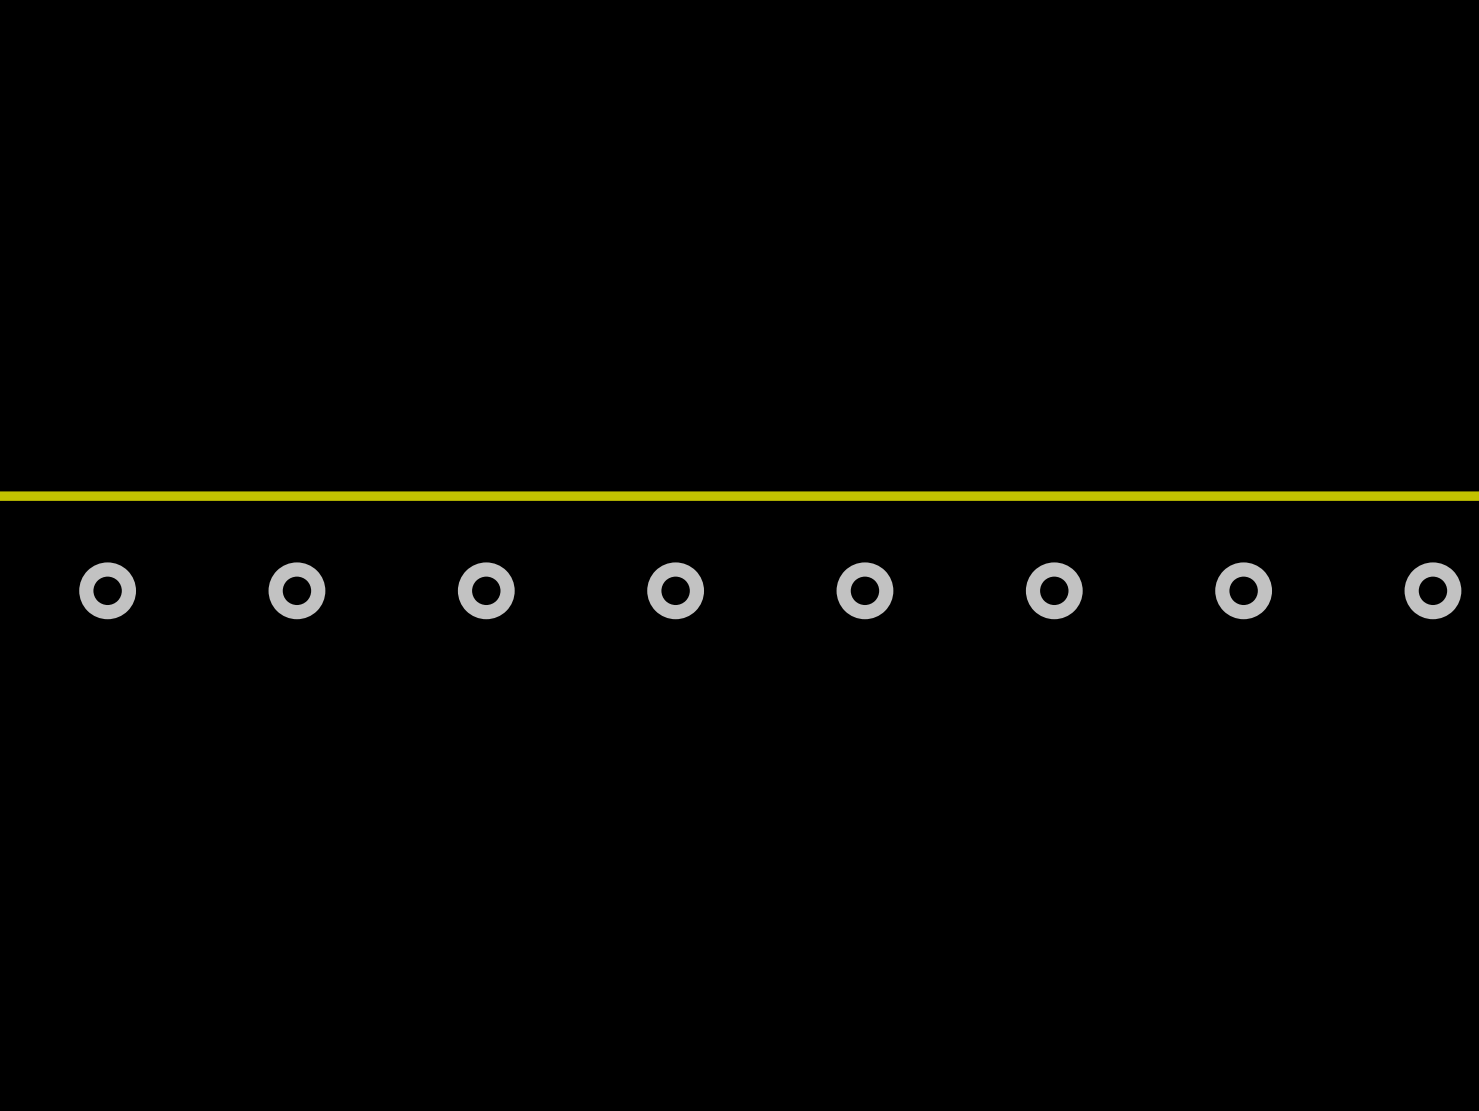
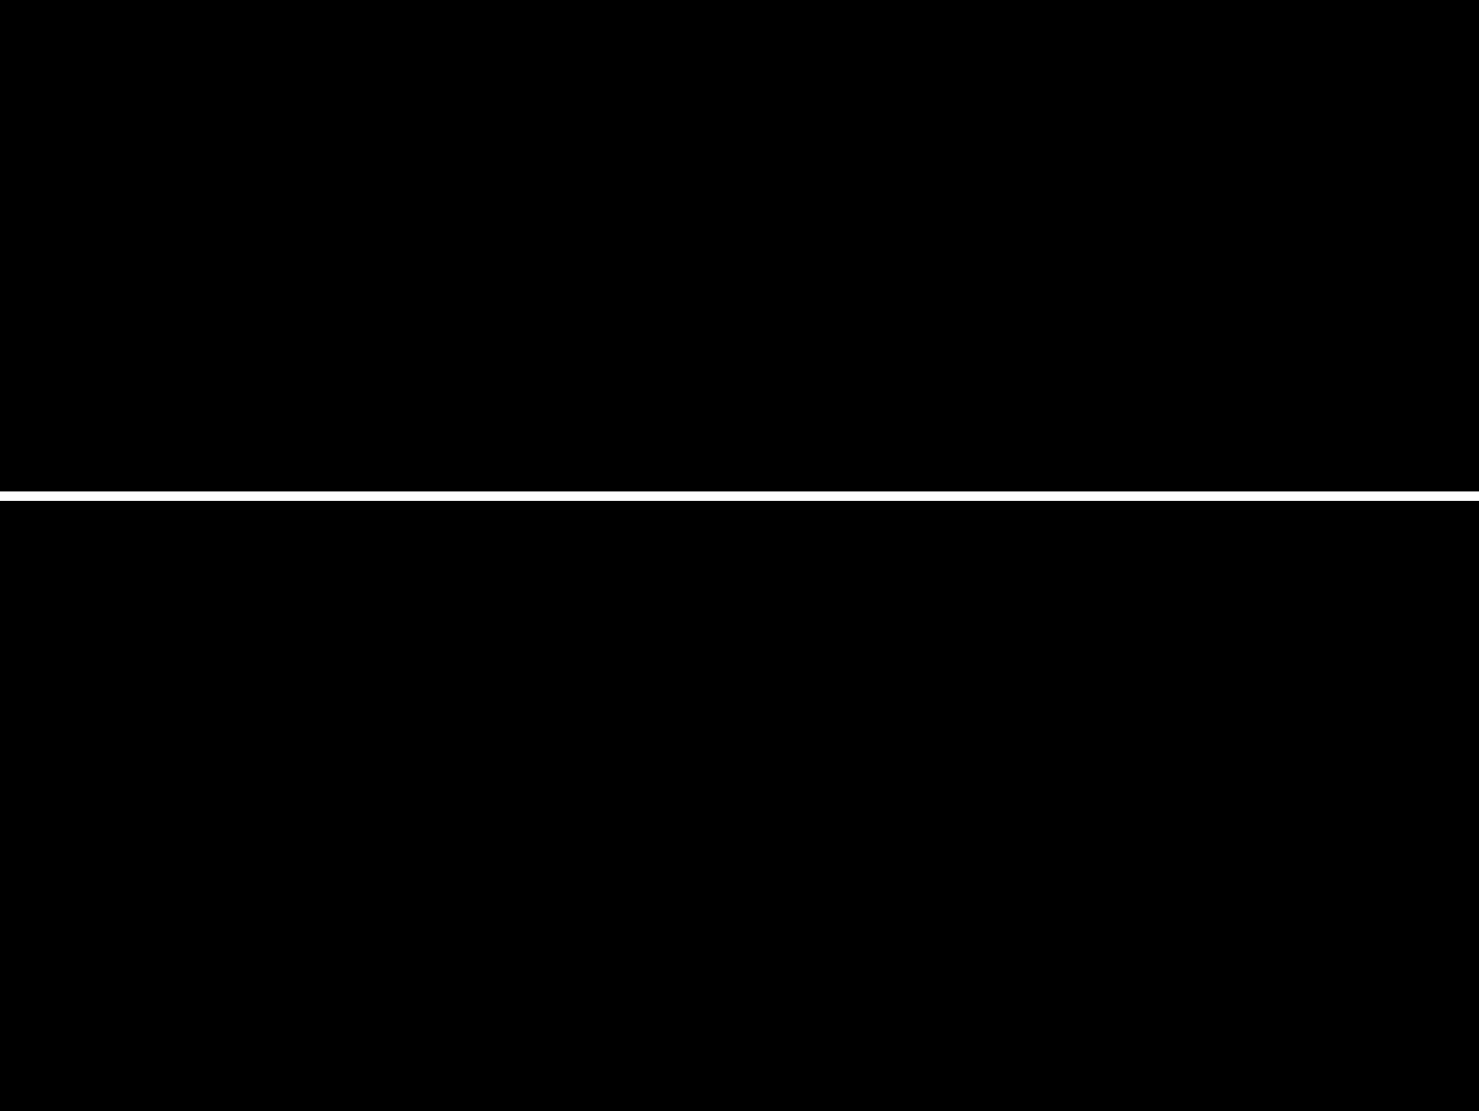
via: (107, 590) -> none
via: (296, 590) -> none
via: (486, 590) -> none
via: (675, 590) -> none
via: (864, 590) -> none
via: (1054, 590) -> none
via: (1243, 590) -> none
via: (1432, 590) -> none

